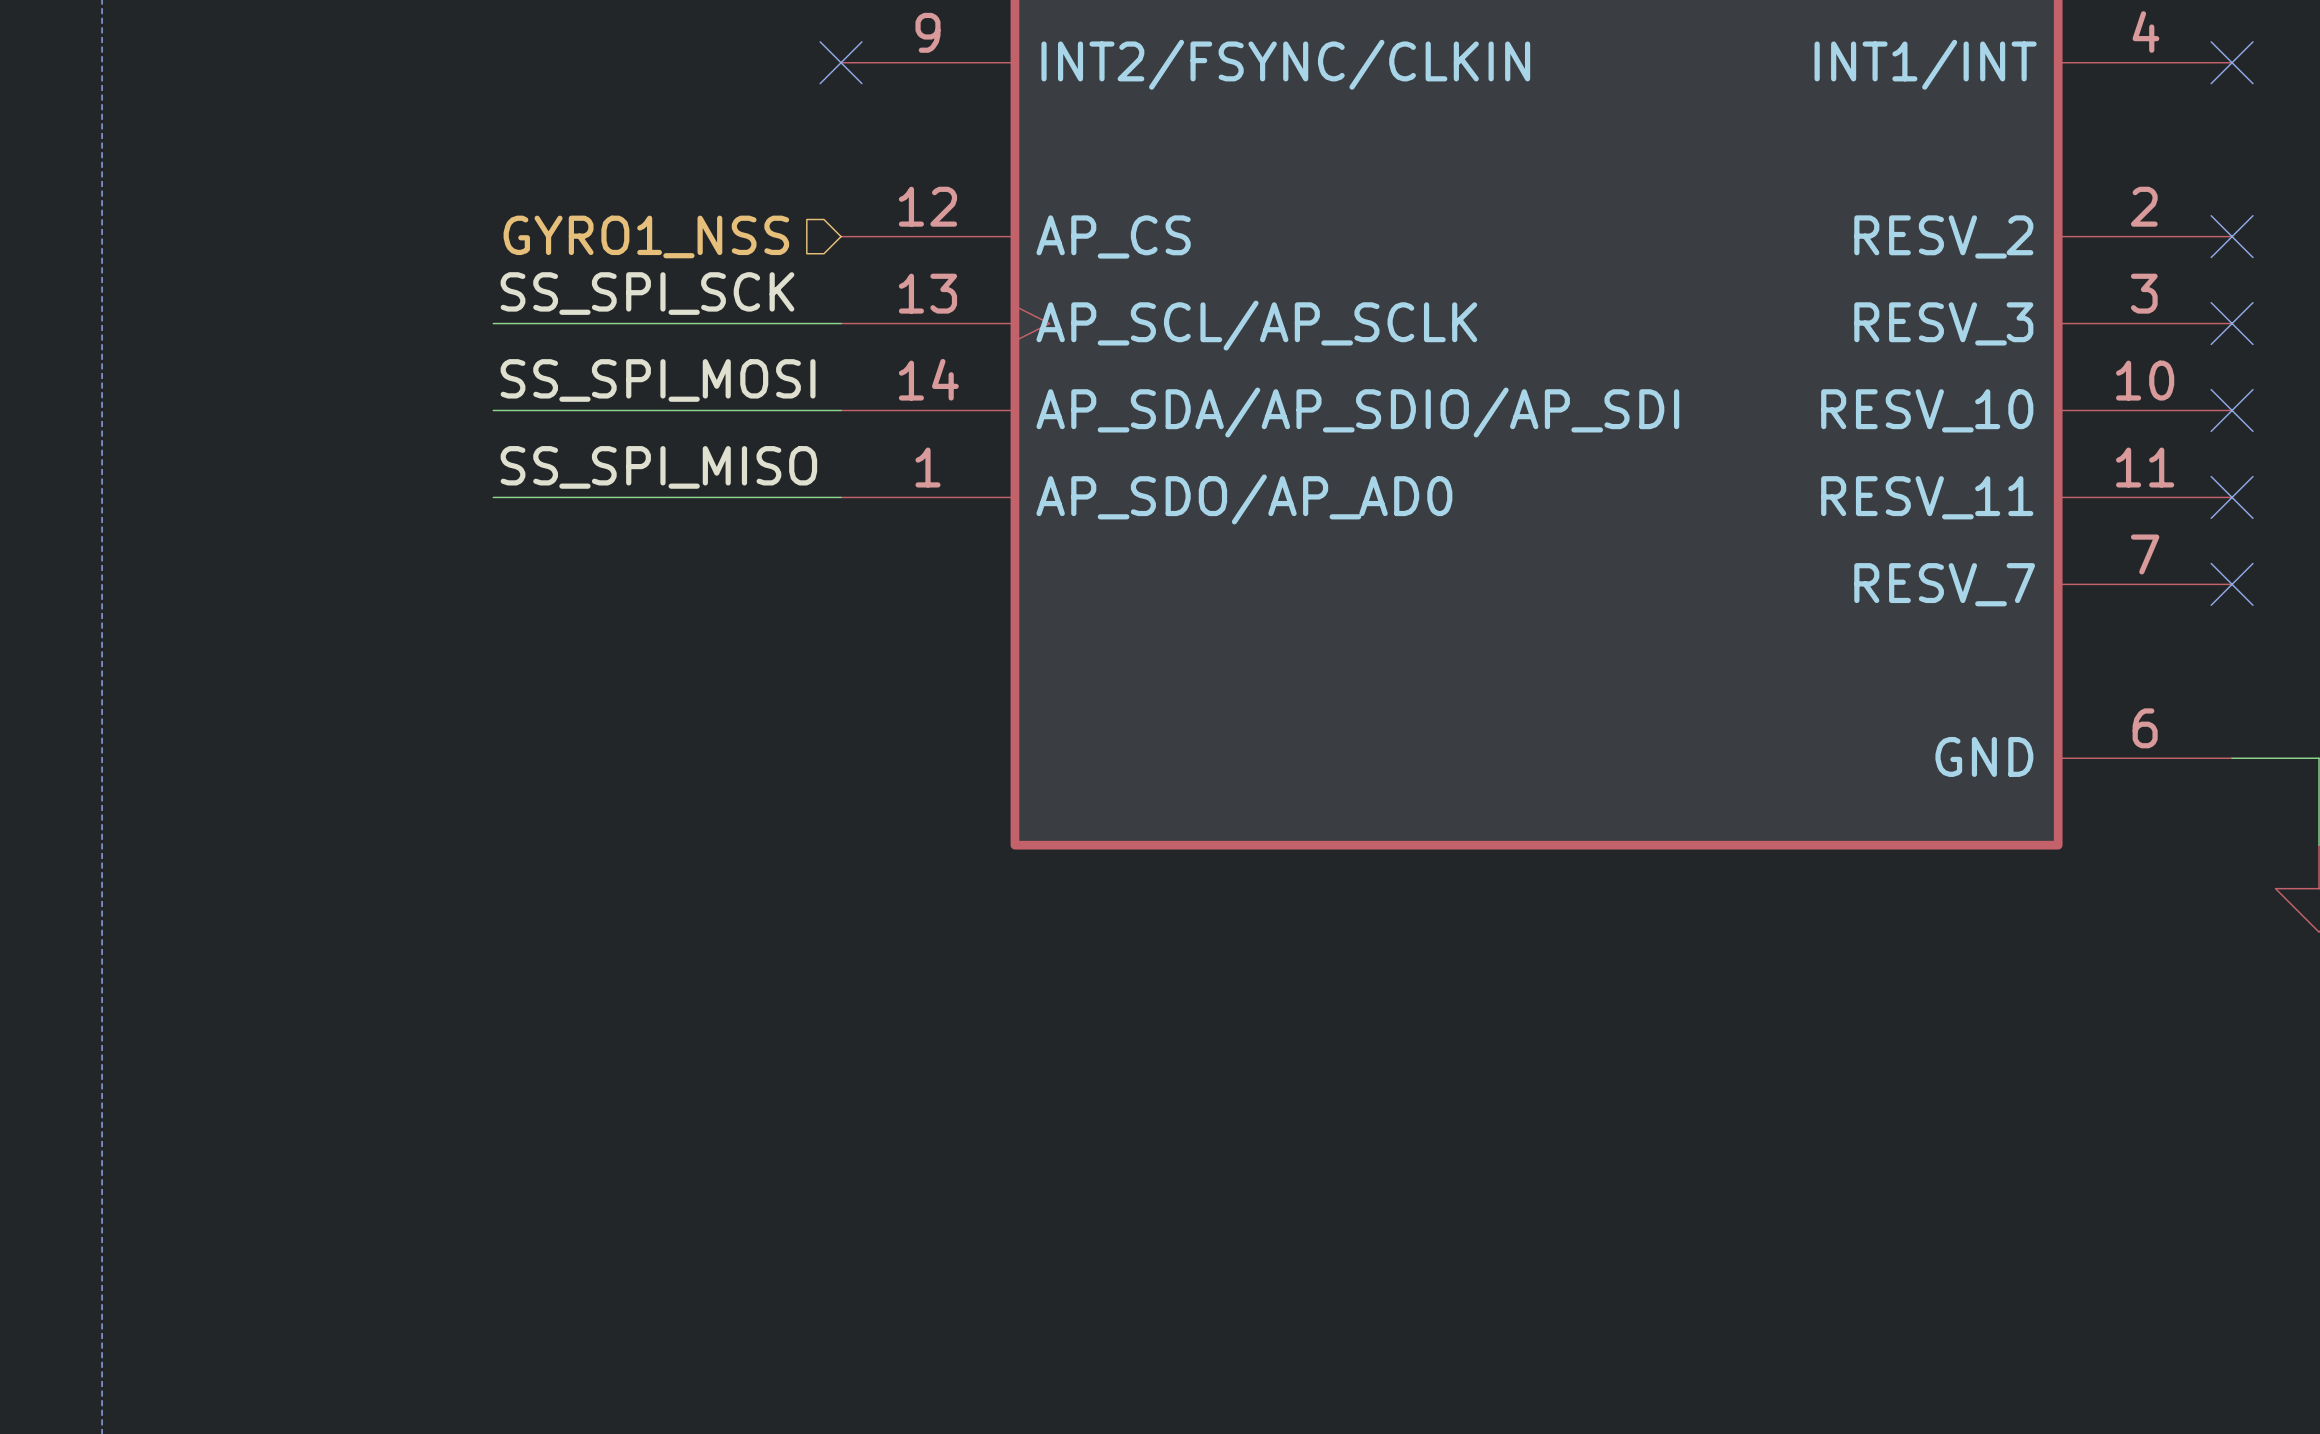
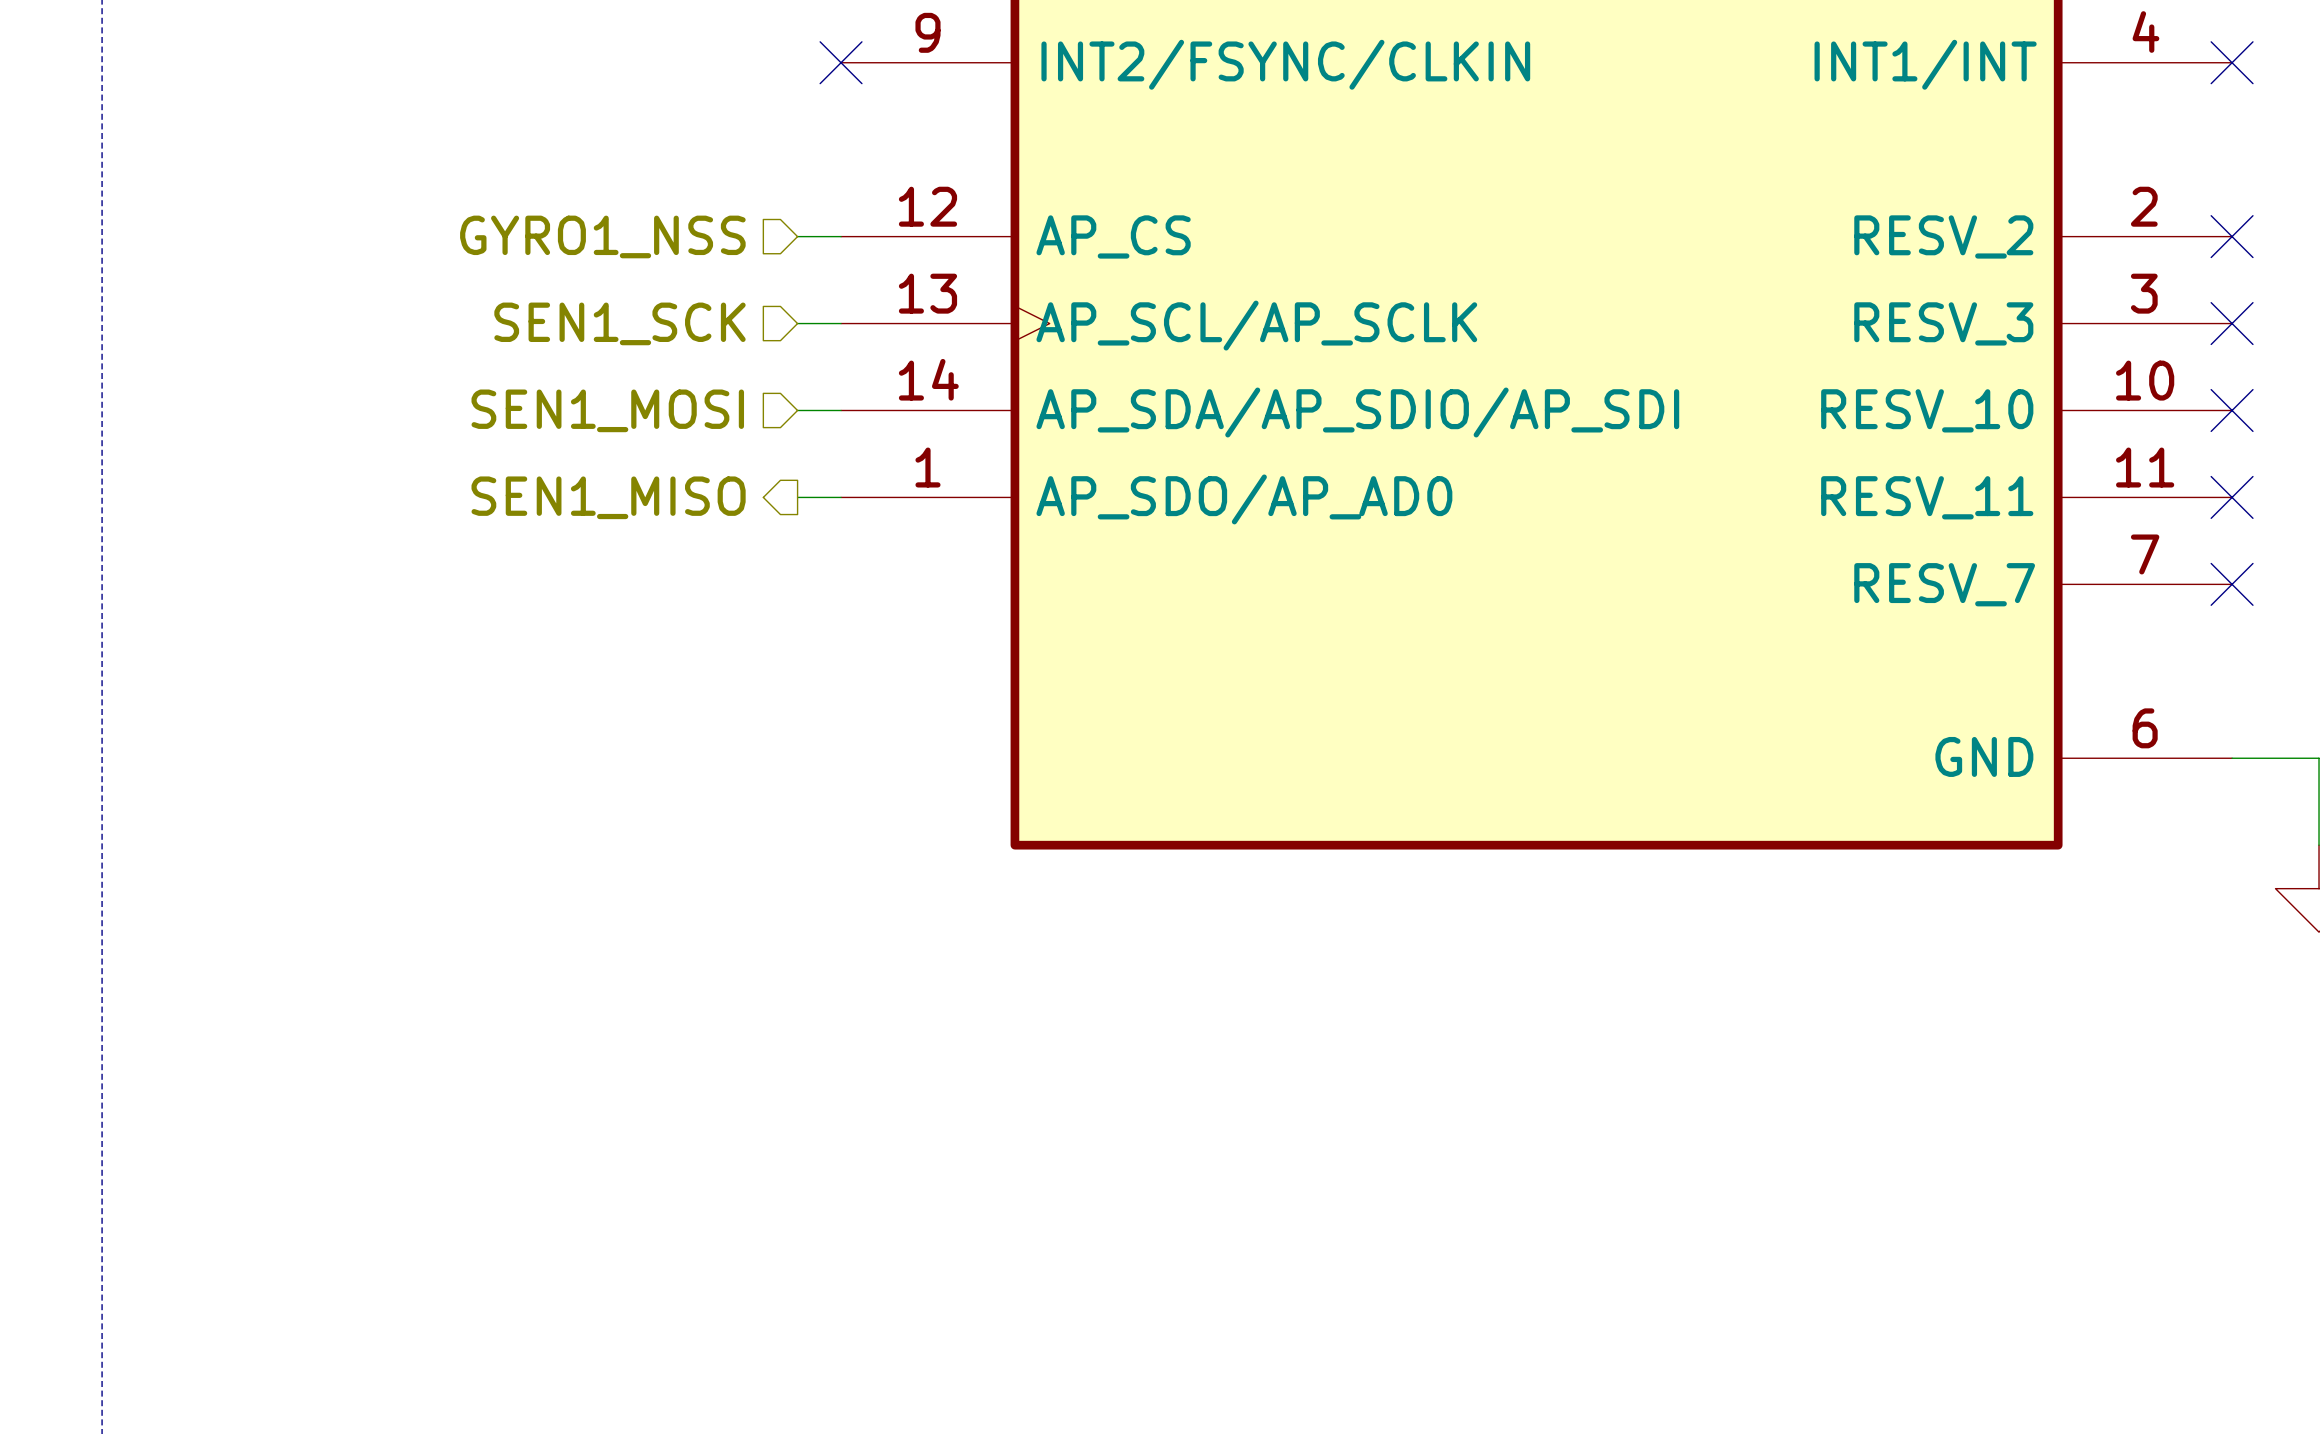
hierarchical label position: GYRO1_NSS (646, 236) -> GYRO1_NSS (602, 236)
wire: none -> (797, 236) (841, 236)
label: SS_SPI_SCK (647, 293) -> none
wire: (493, 323) (797, 323) -> none
hierarchical label: none -> SEN1_SCK (619, 323)
label: SS_SPI_MOSI (658, 380) -> none
wire: (493, 410) (797, 410) -> none
hierarchical label: none -> SEN1_MOSI (607, 410)
label: SS_SPI_MISO (658, 467) -> none
wire: (493, 497) (797, 497) -> none
hierarchical label: none -> SEN1_MISO (608, 497)

